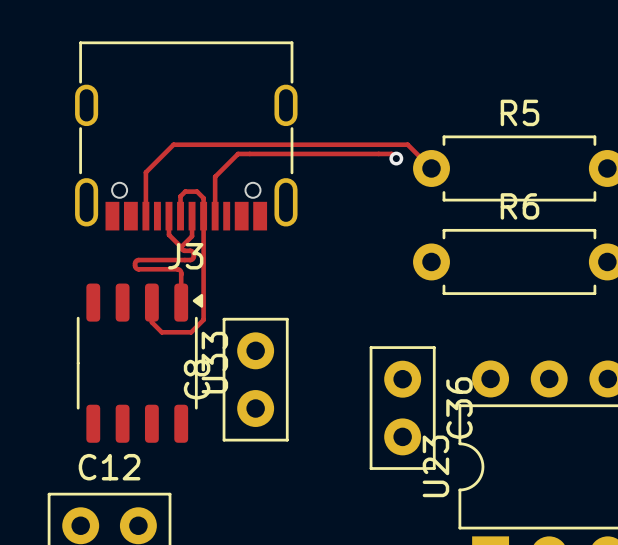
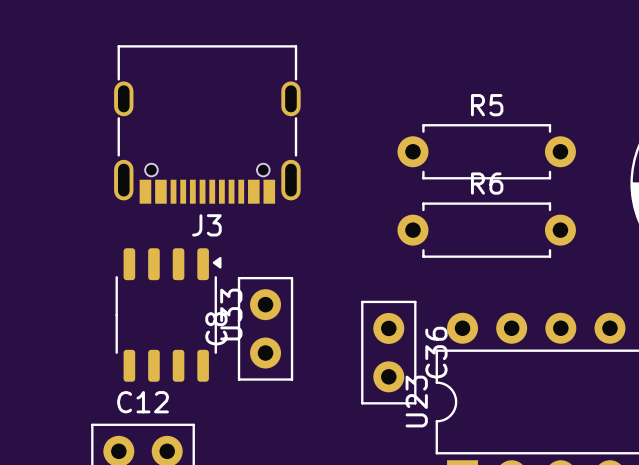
track: (396, 158) (391, 153) (238, 153) (215, 176) (215, 216) -> none
via: (396, 158) -> none
track: (431, 168) (407, 144) (173, 144) (145, 172) (145, 216) -> none
track: (168, 216) (168, 234) (181, 247) -> none
track: (180, 216) (180, 196) (185, 191) (197, 191) (203, 198) (203, 319) (191, 332) (161, 332) (151, 322) (151, 302) -> none
track: (192, 216) (192, 236) (181, 247) -> none
track: (181, 247) (183, 250) (192, 251) (192, 258) (138, 260) (135, 263) (138, 269) (179, 270) (181, 302) -> none

